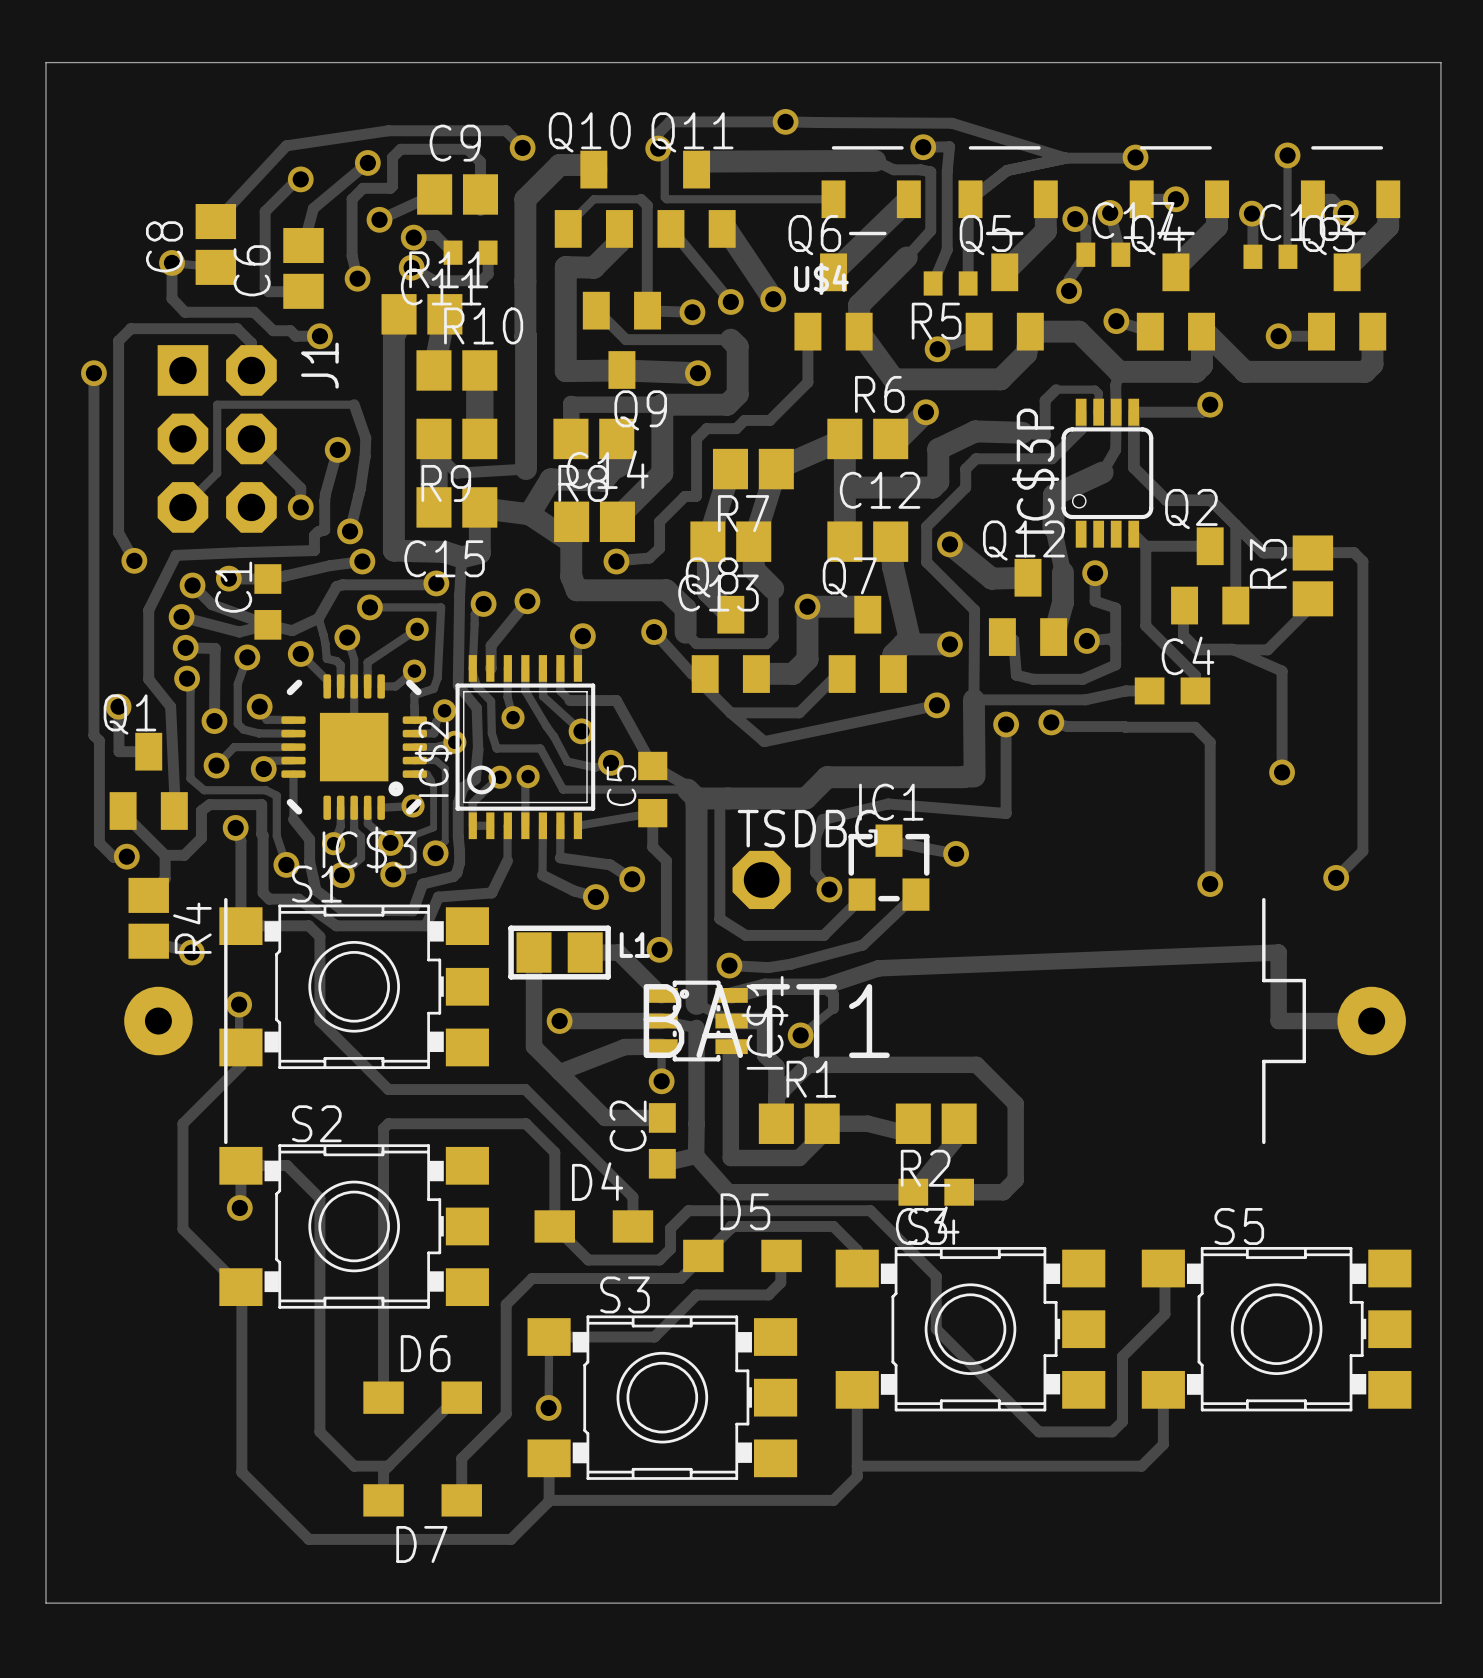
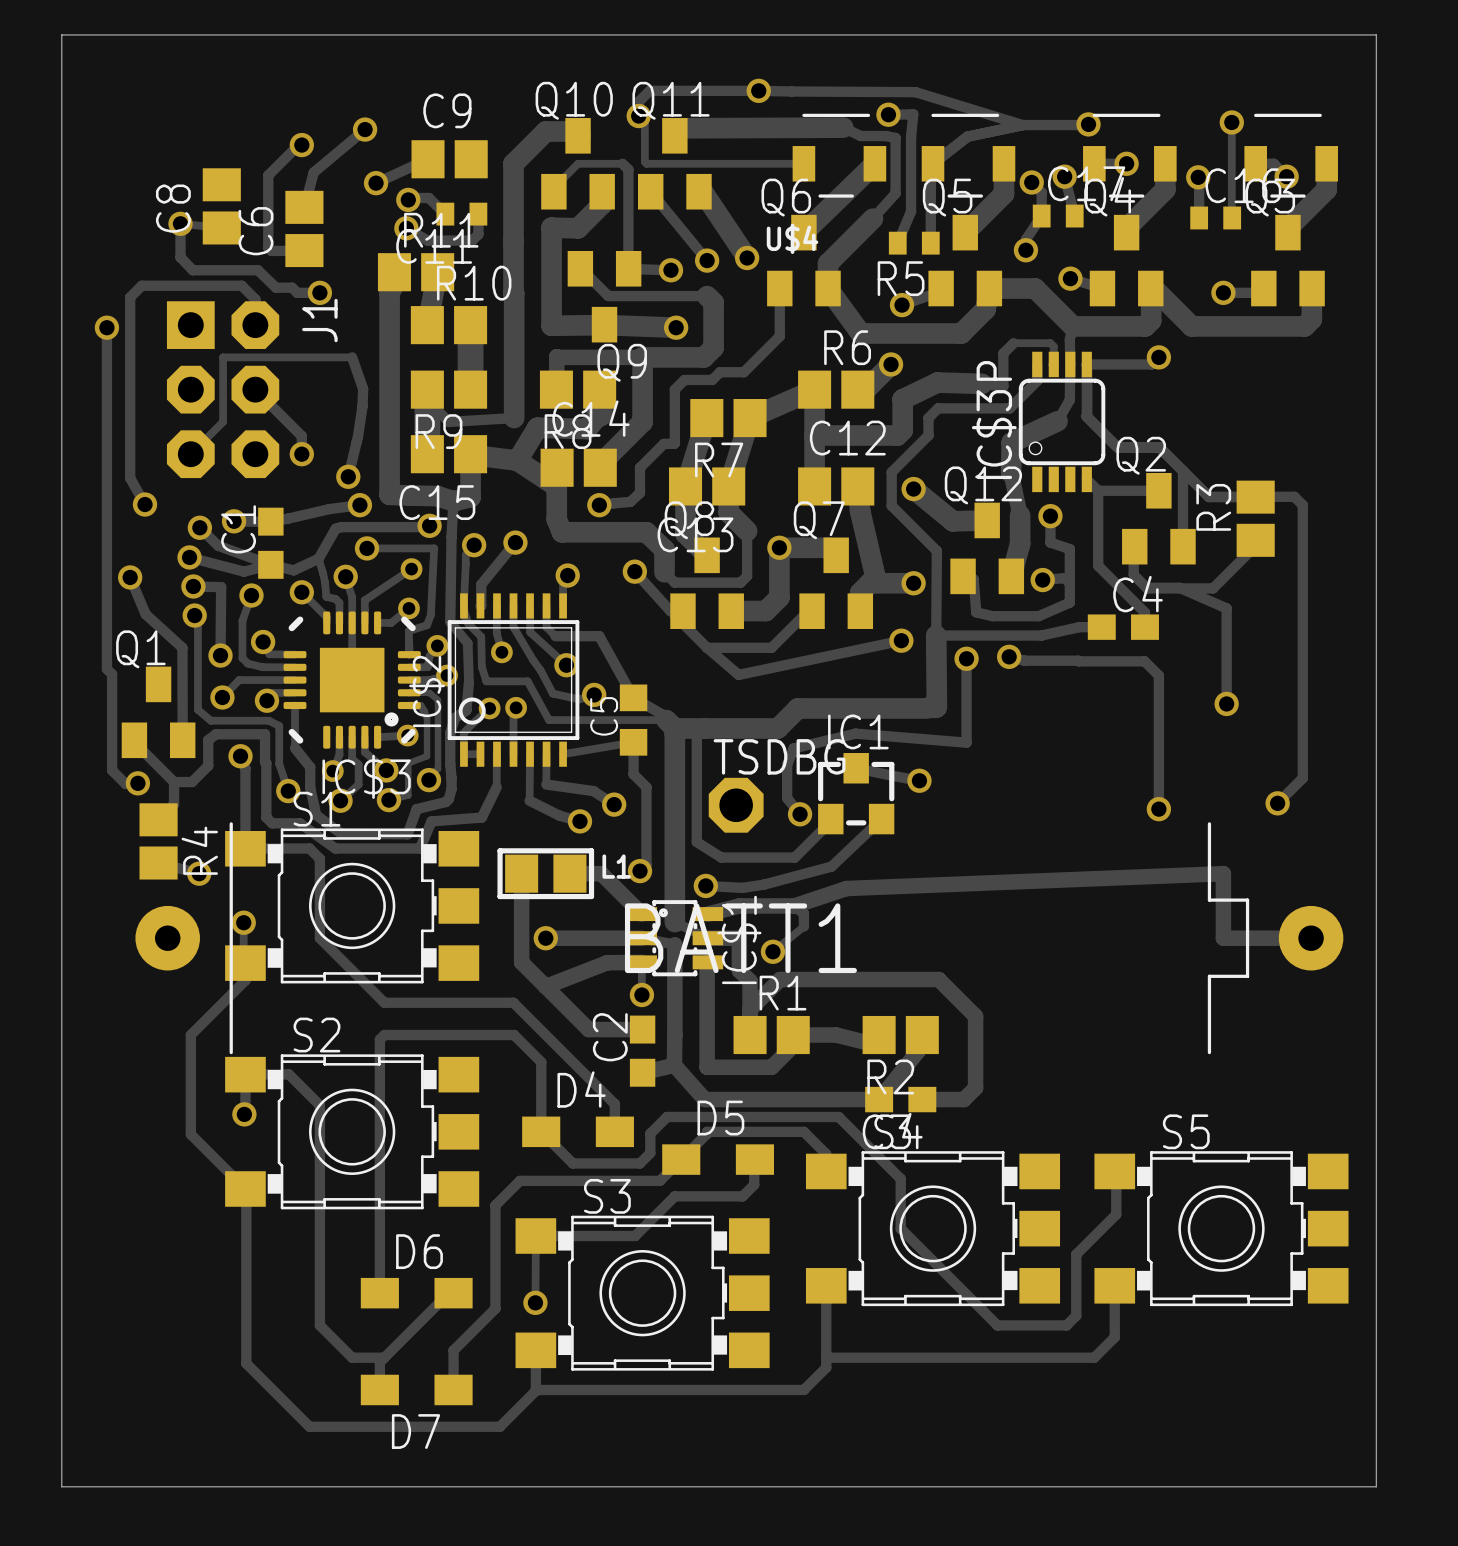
track: (522, 147) (506, 130) (388, 130) (286, 145) (215, 221) -> none
via: (522, 147) -> none
track: (480, 210) (480, 161) (467, 149) (400, 149) (392, 157) (392, 186) (390, 188) (363, 188) (352, 199) (352, 256) (357, 278) -> none
via: (357, 278) -> none
track: (337, 449) (325, 494) (324, 530) (314, 535) (314, 550) (176, 555) (148, 610) (148, 679) (170, 706) (174, 811) -> (130, 577) (145, 614) (182, 647) (182, 740)
via: (337, 449) -> none
track: (118, 706) (119, 751) (148, 751) (148, 744) -> none
via position: (118, 706) -> (130, 577)

